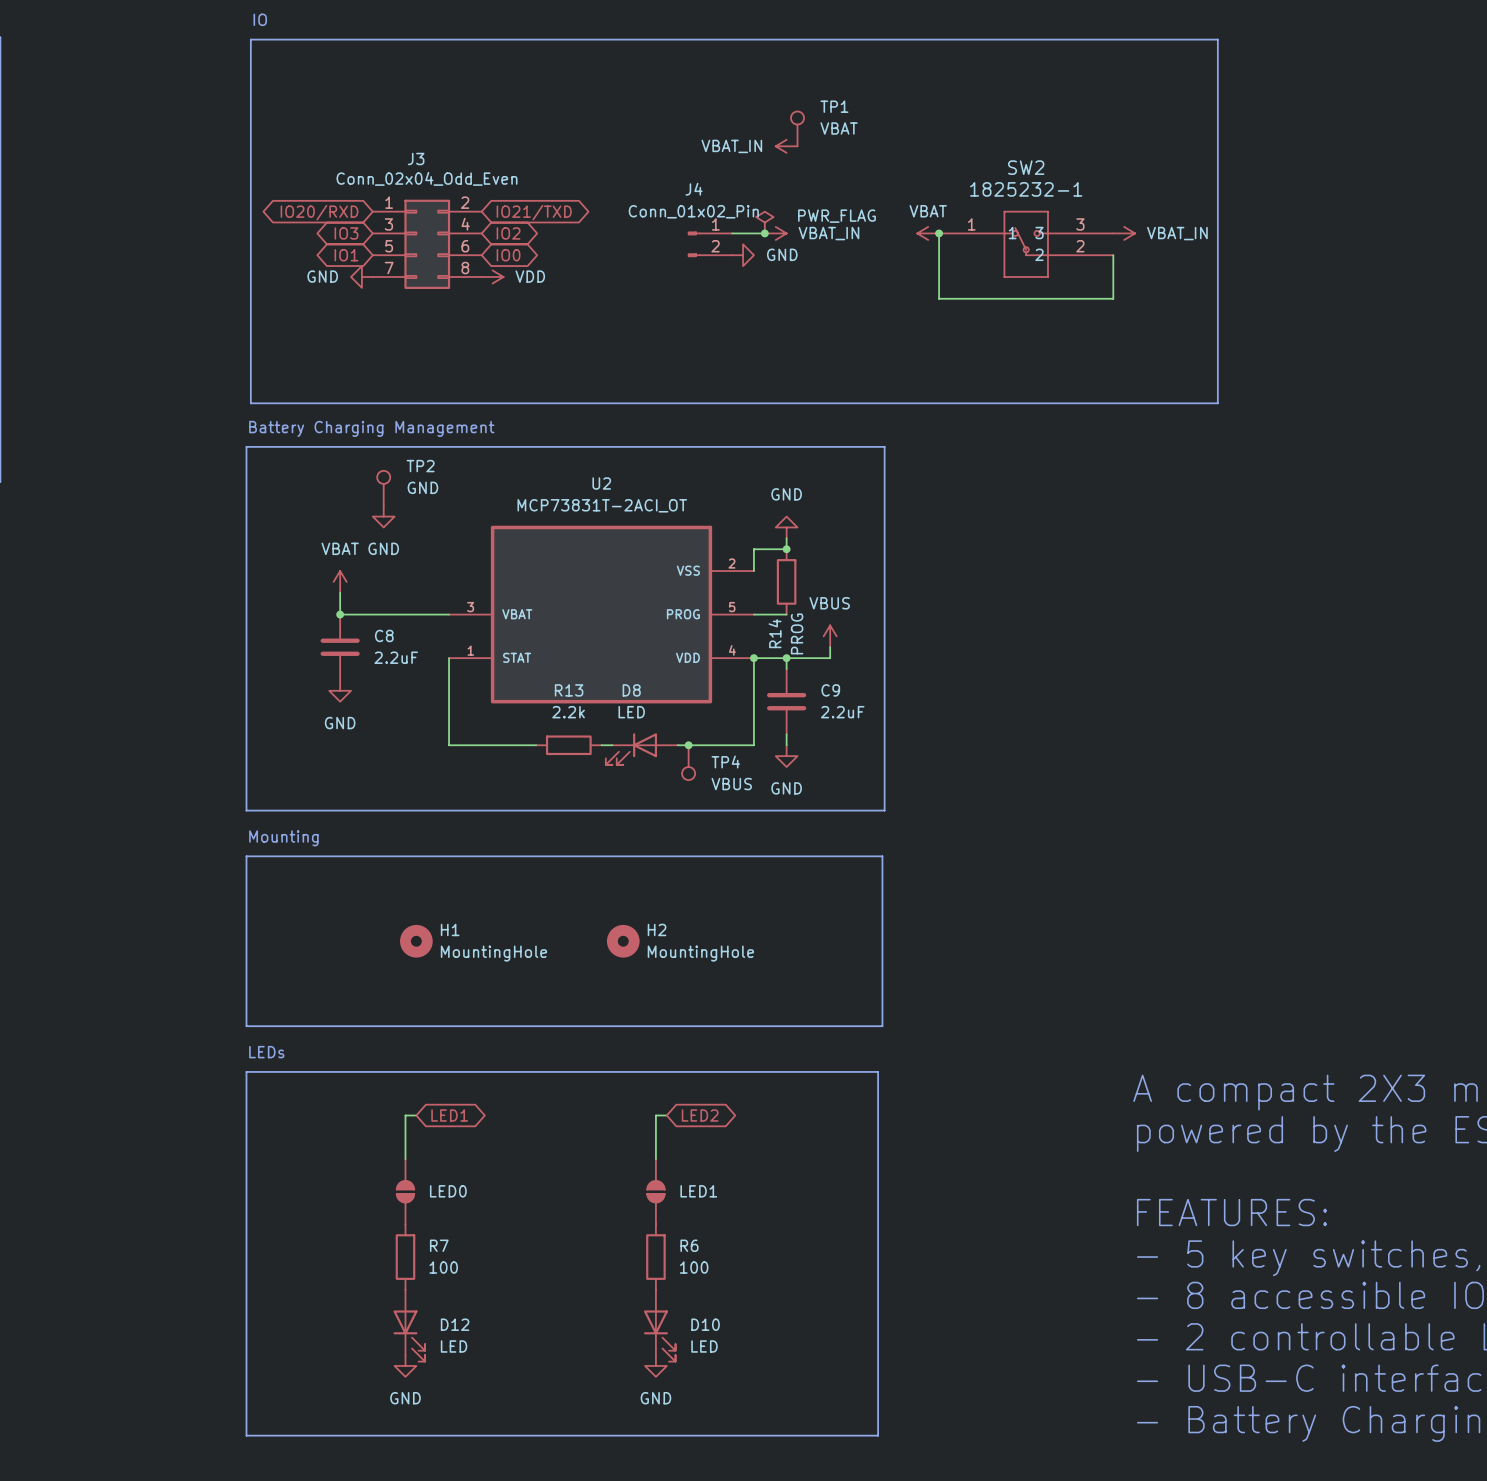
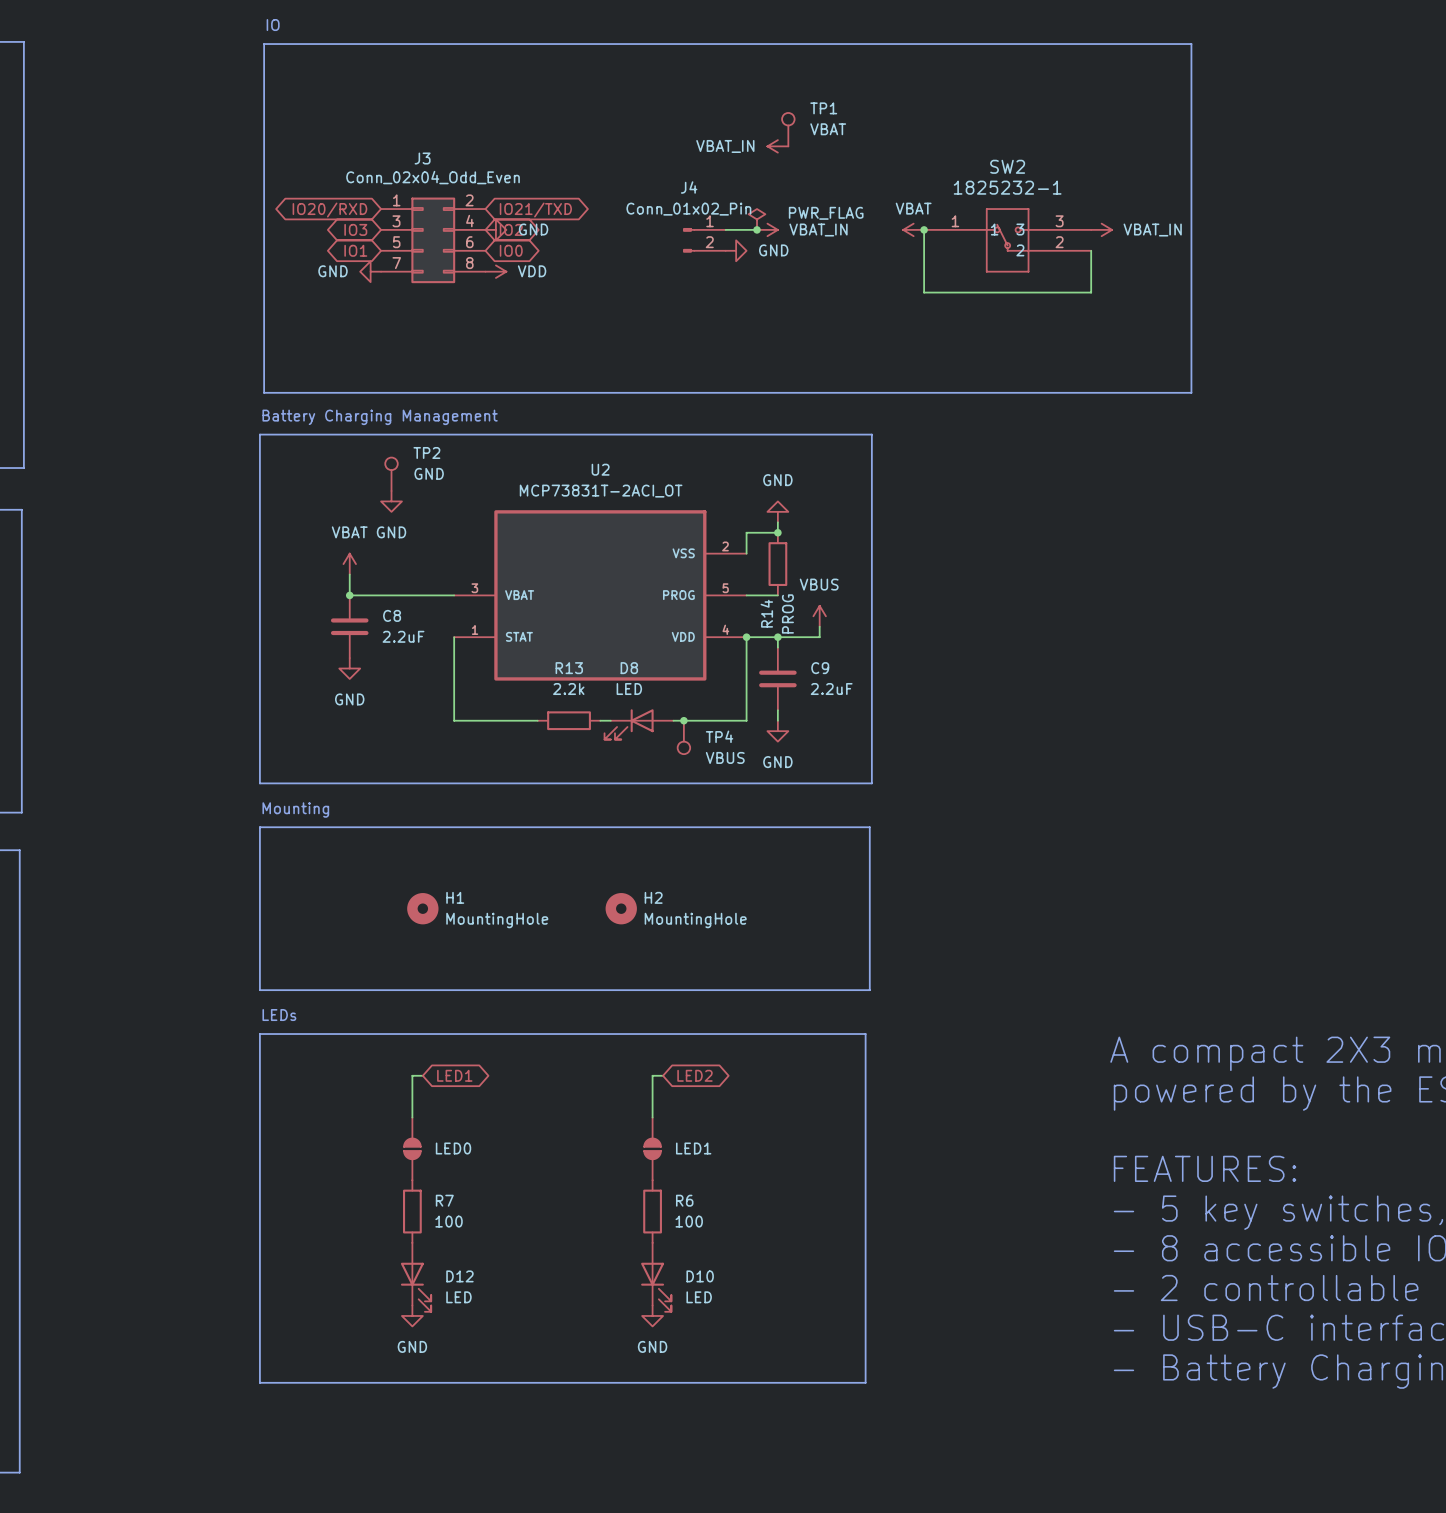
power symbol: none -> GND (495, 229)

